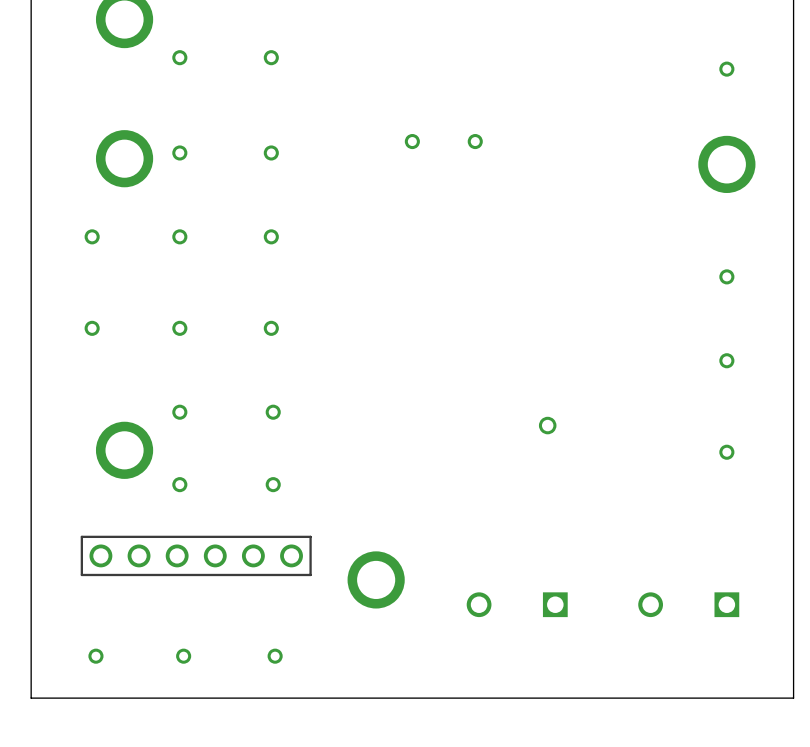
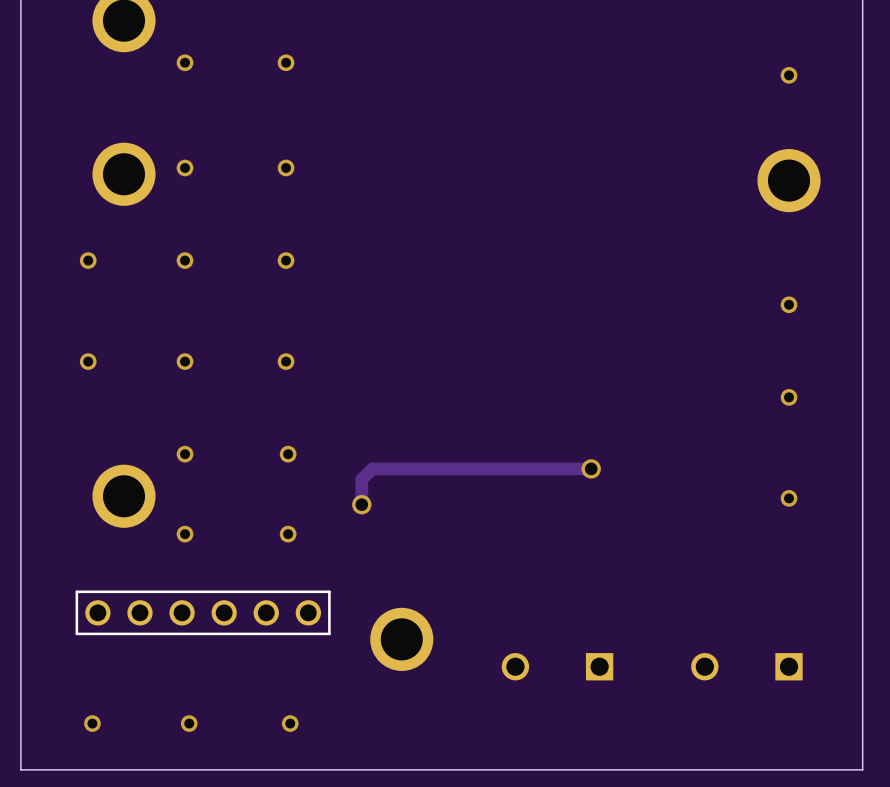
via: (412, 141) -> none
via: (475, 141) -> none
track: none -> (589, 468) (372, 468) (361, 479) (361, 504)
via: none -> (361, 504)

